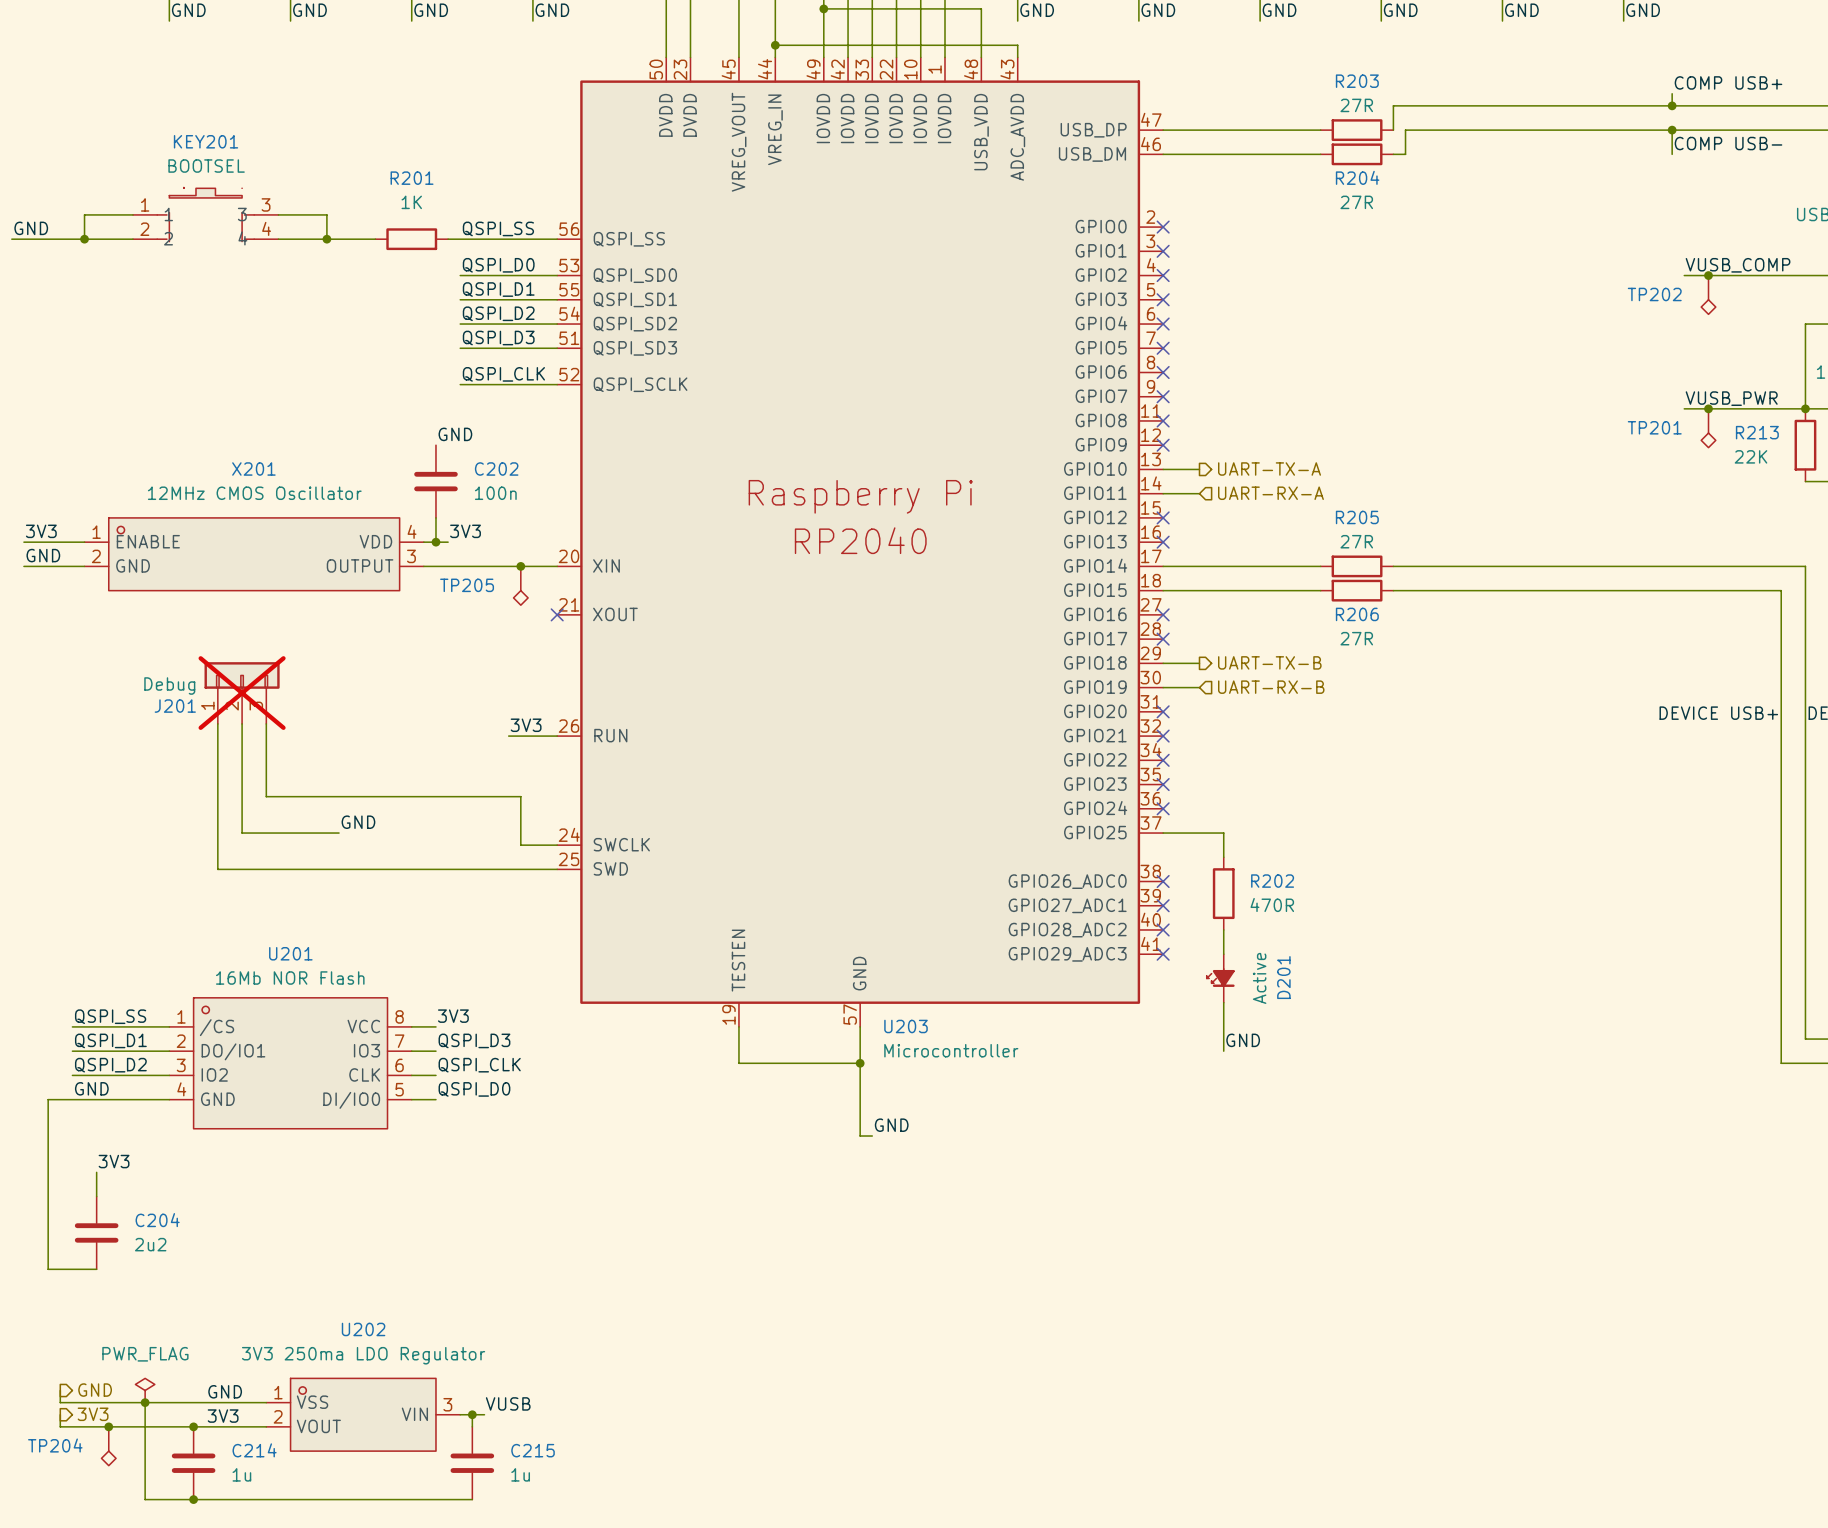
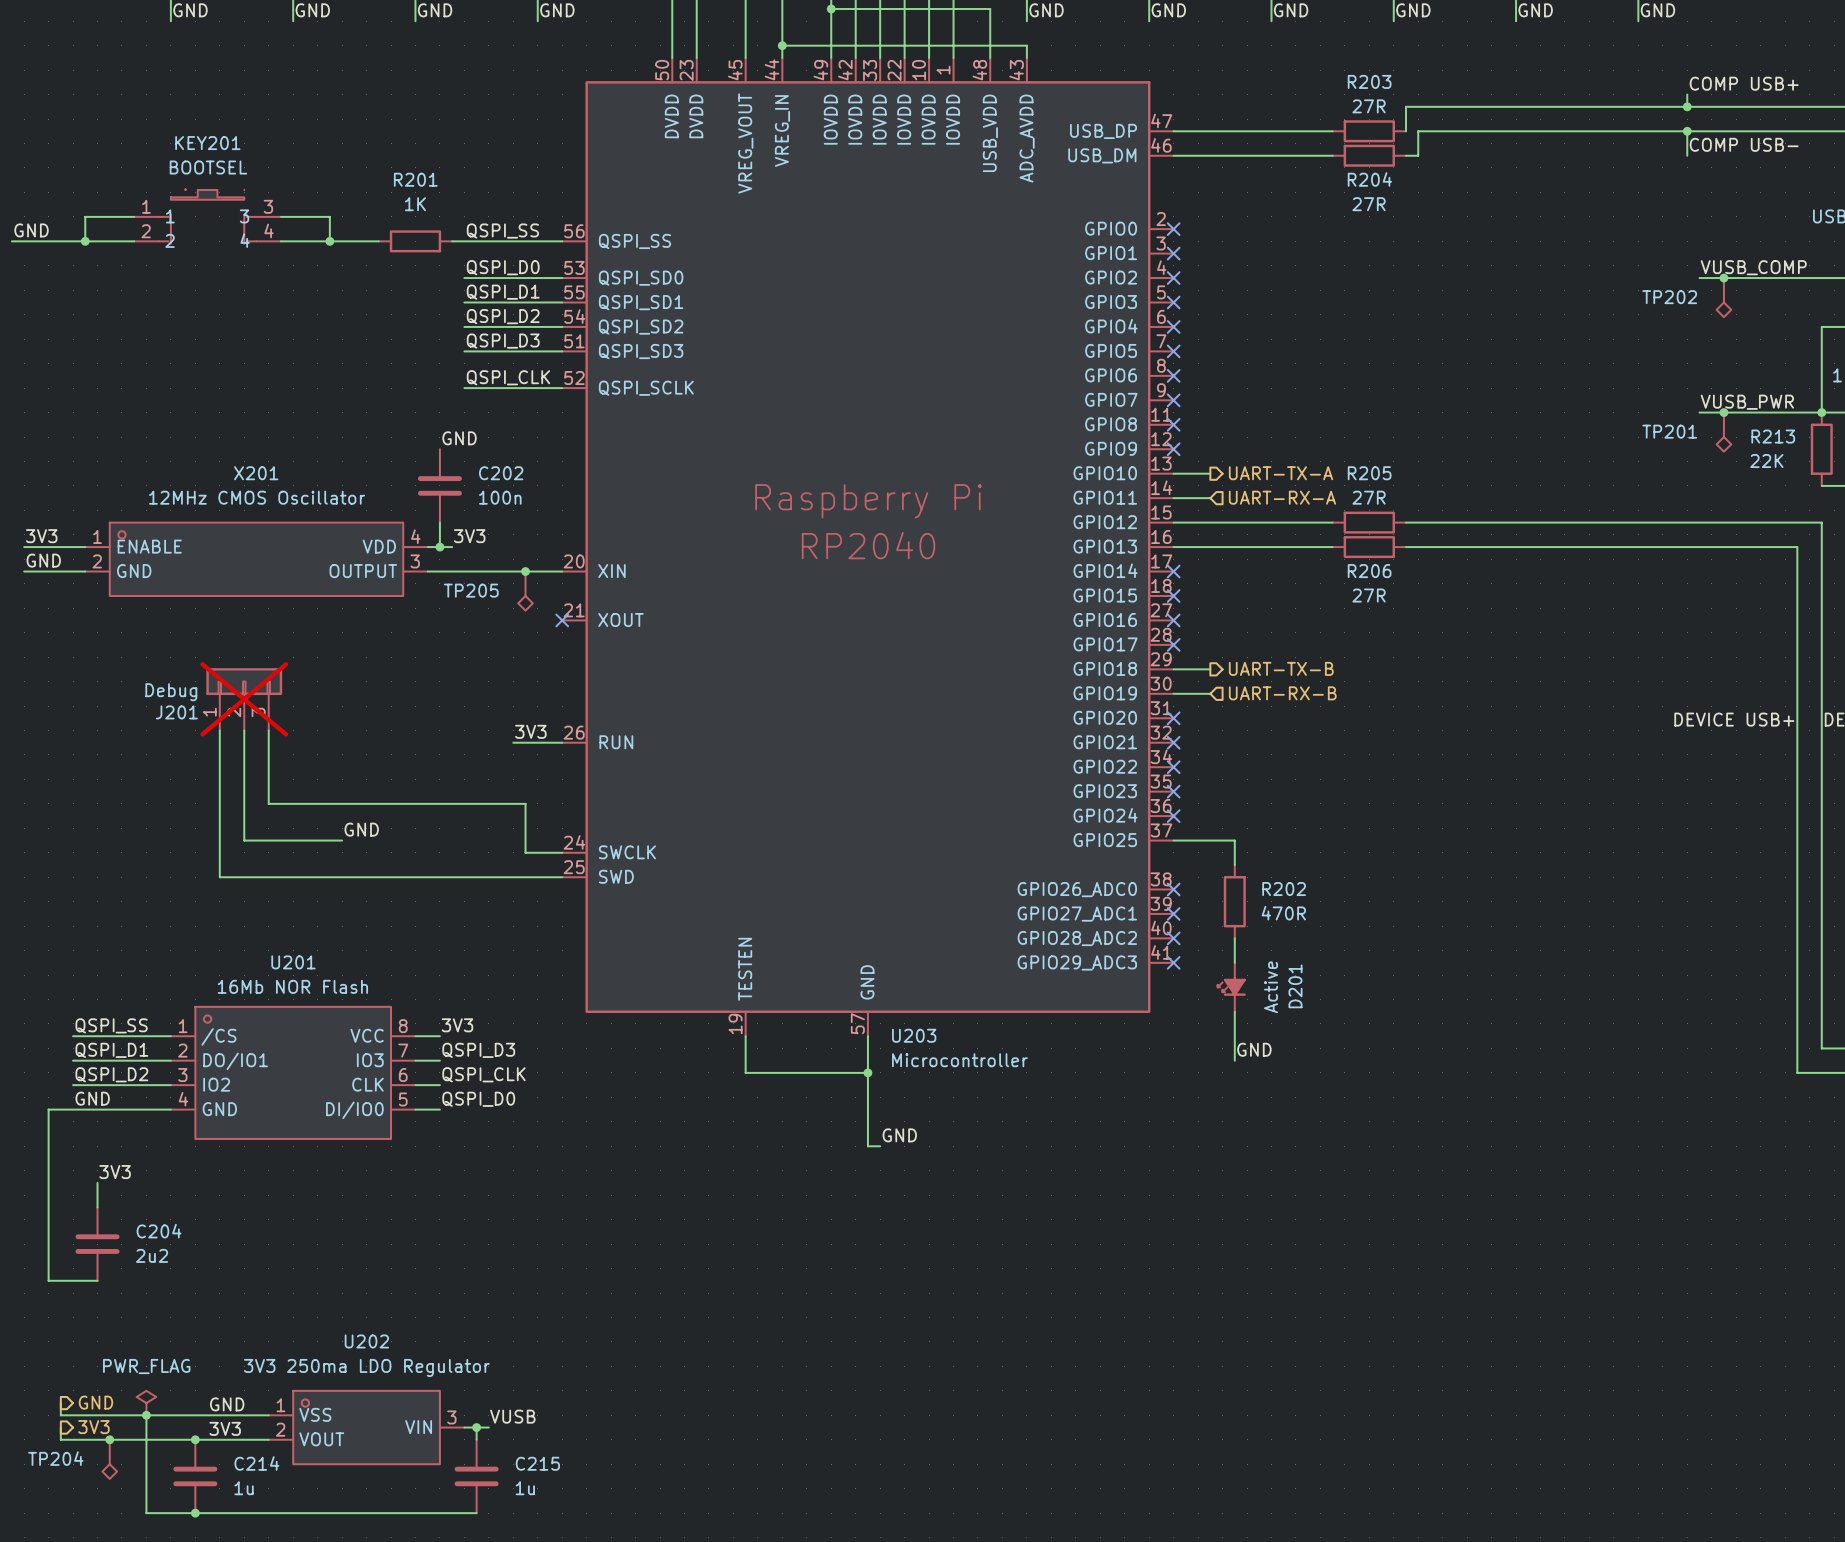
no-connect mark: (1163, 517) -> none
no-connect mark: (1163, 542) -> none
wire: (1163, 566) (1320, 566) -> (1173, 522) (1332, 522)
no-connect mark: none -> (1173, 571)
R206 position: (1357, 566) -> (1369, 522)
wire: (1393, 566) (1805, 566) -> (1406, 522) (1821, 522) (1821, 571)
wire: (1163, 590) (1320, 590) -> (1173, 547) (1332, 547)
no-connect mark: none -> (1173, 595)
R205 position: (1357, 590) -> (1369, 547)
wire: (1393, 590) (1781, 590) -> (1406, 547) (1797, 547) (1797, 595)

